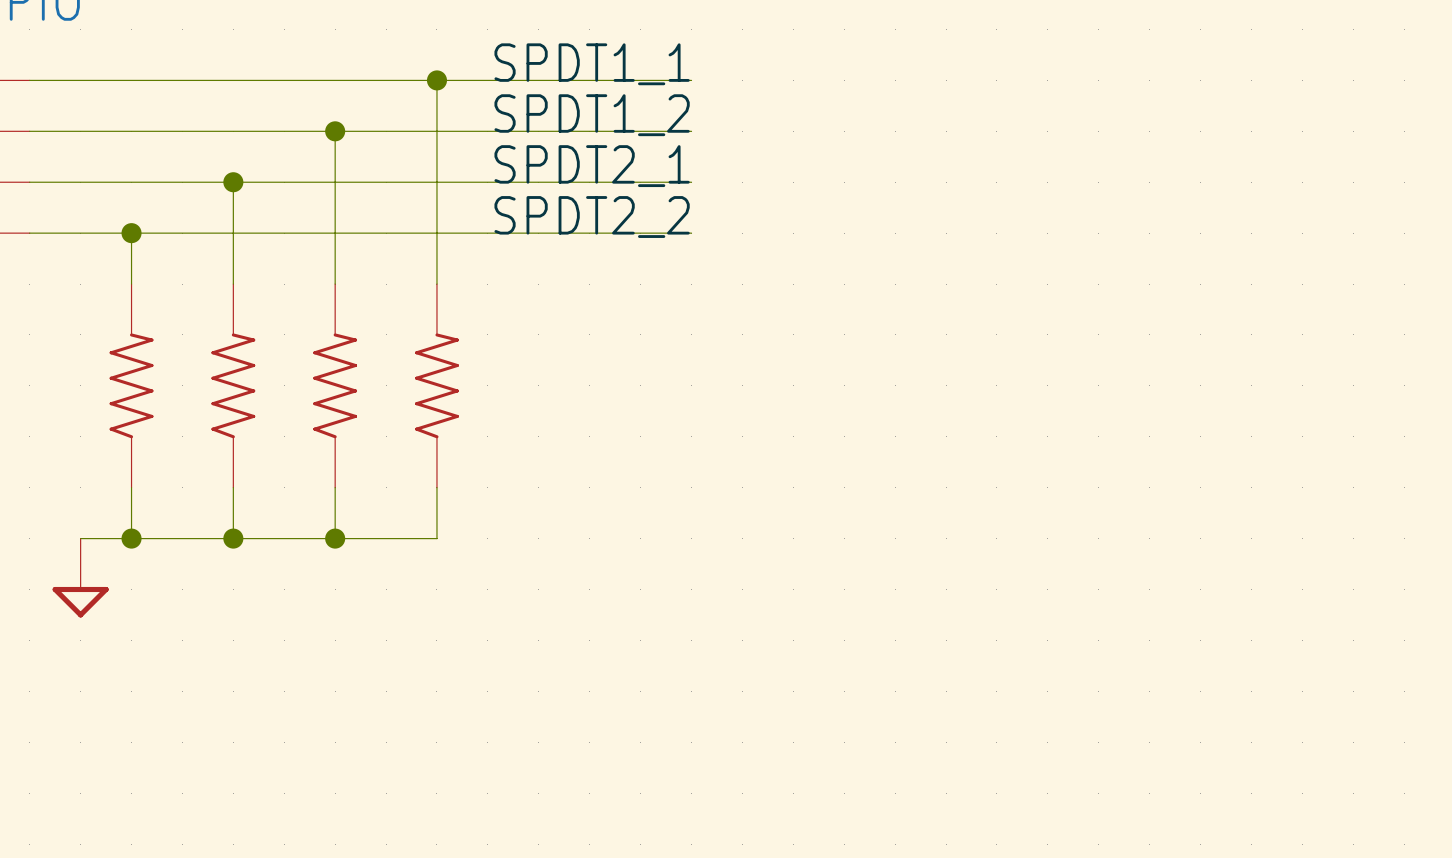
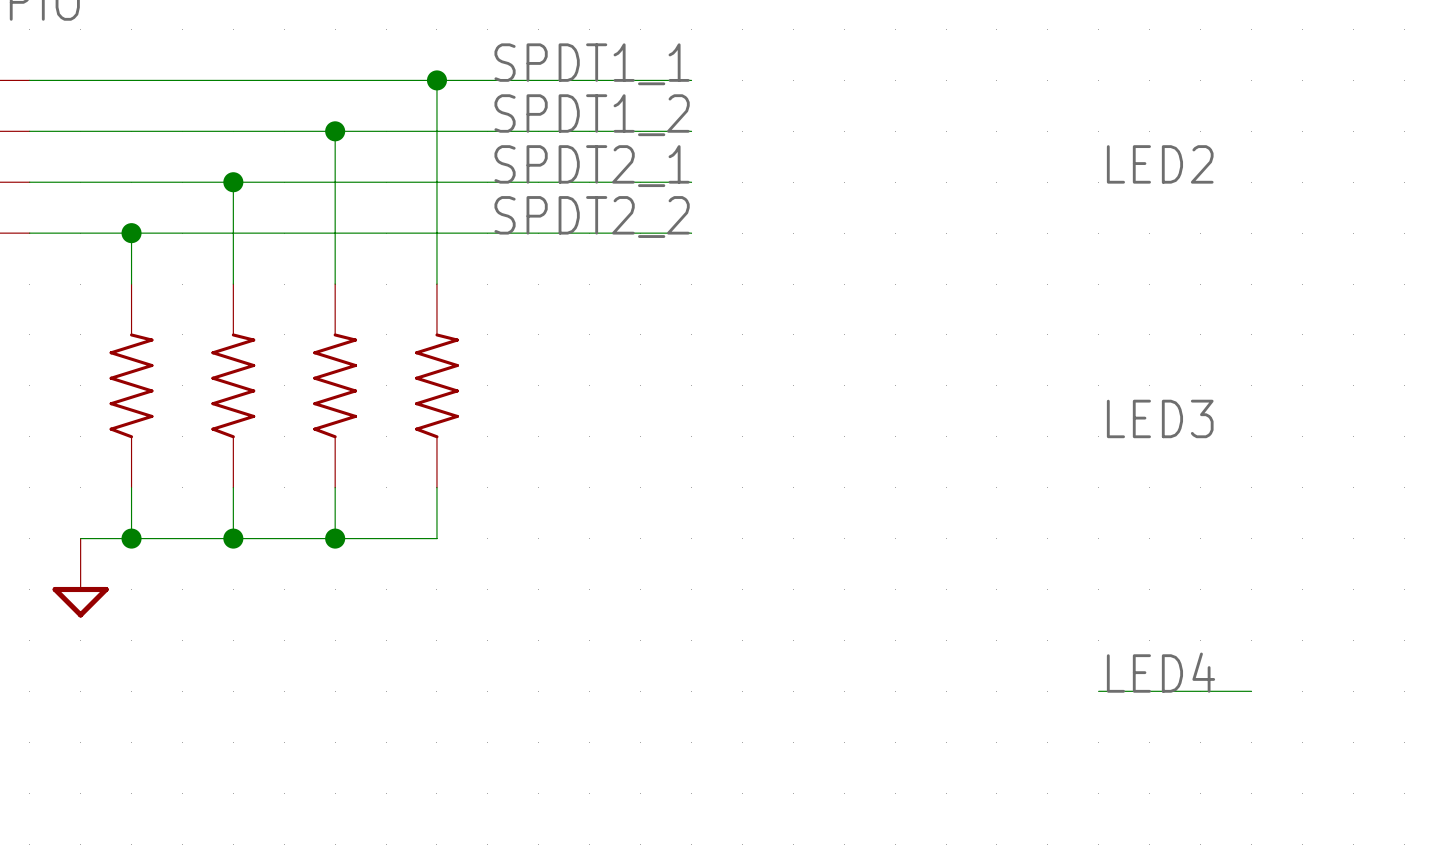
label: none -> LED2 (1160, 164)
label: none -> LED3 (1160, 418)
label: none -> LED4 (1160, 672)
wire: none -> (1098, 691) (1251, 691)

